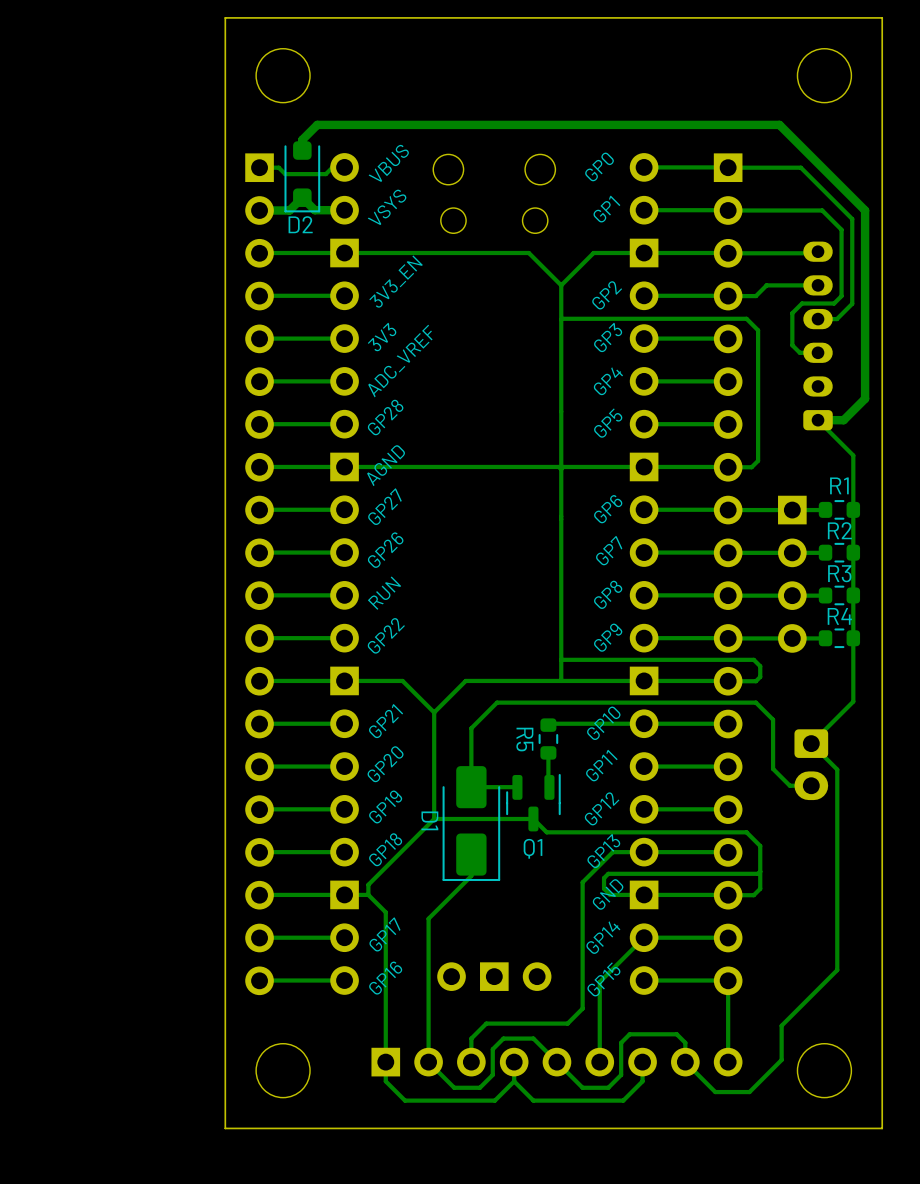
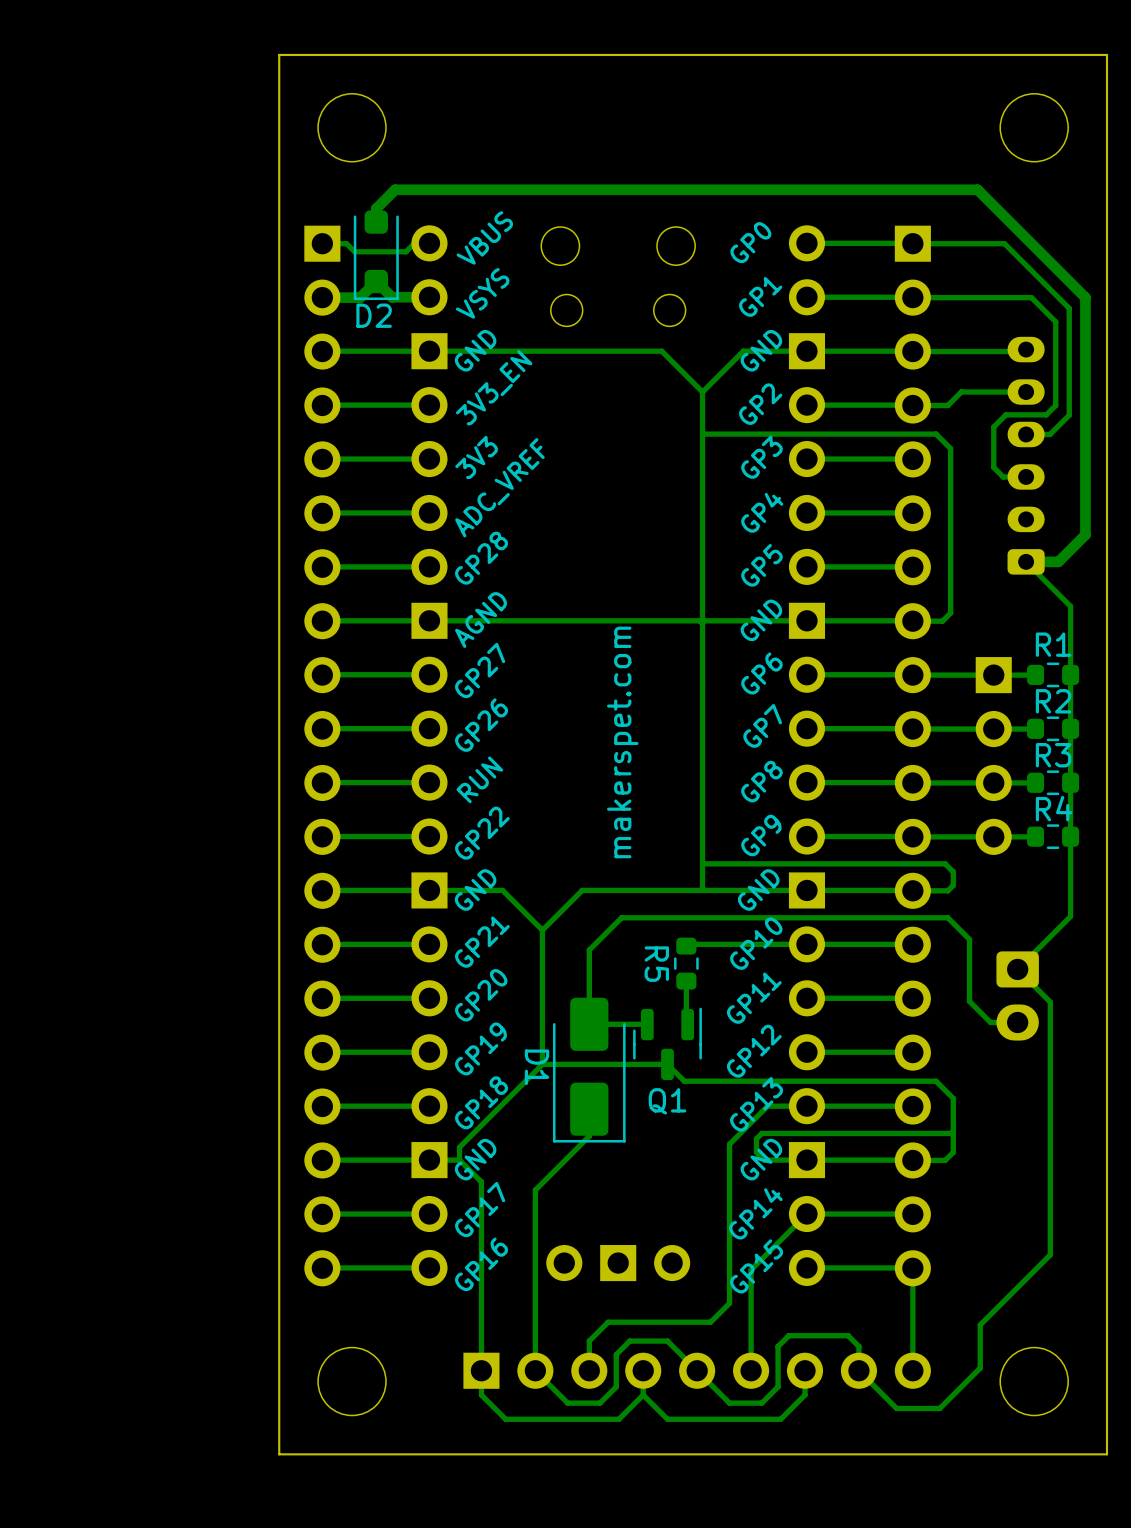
part text: none -> GND (475, 350)
part text: none -> GND (761, 350)
part text: none -> GND (761, 620)
text: none -> makerspet.com (622, 742)
part text: none -> GND (475, 890)
part text: none -> GND (758, 890)
part text: none -> GND (475, 1159)

